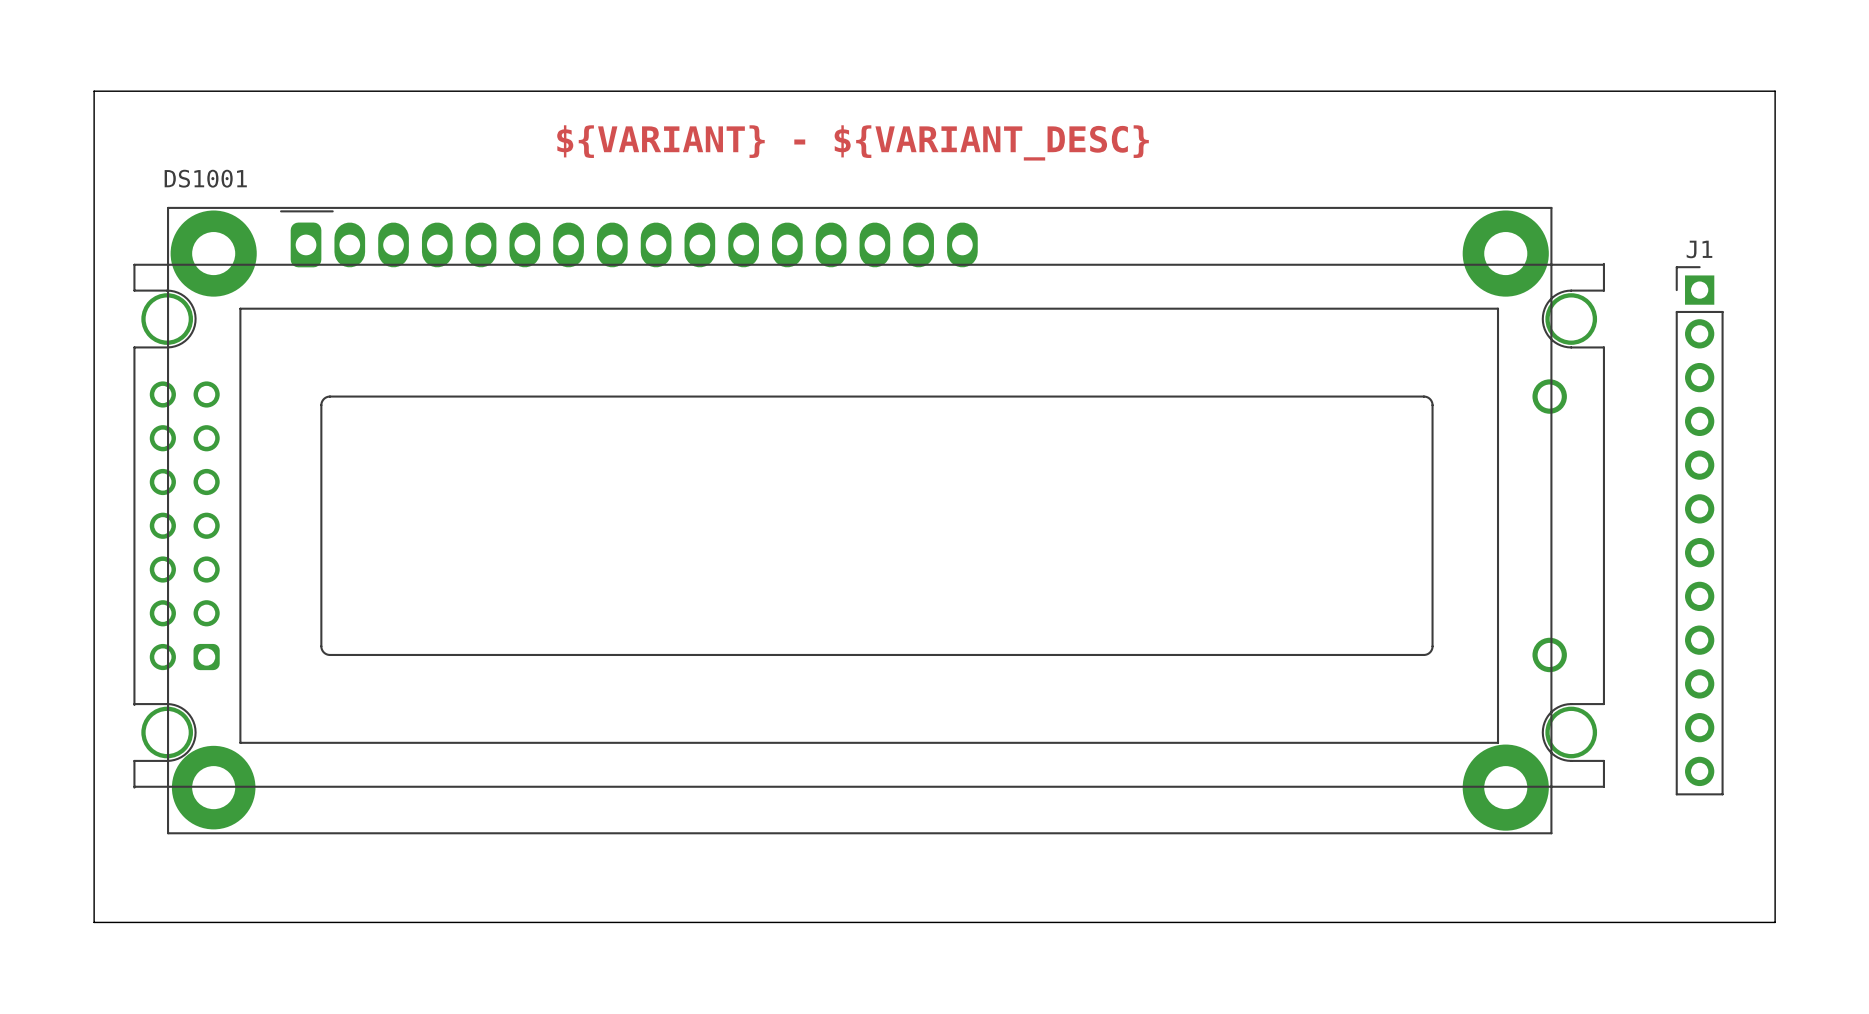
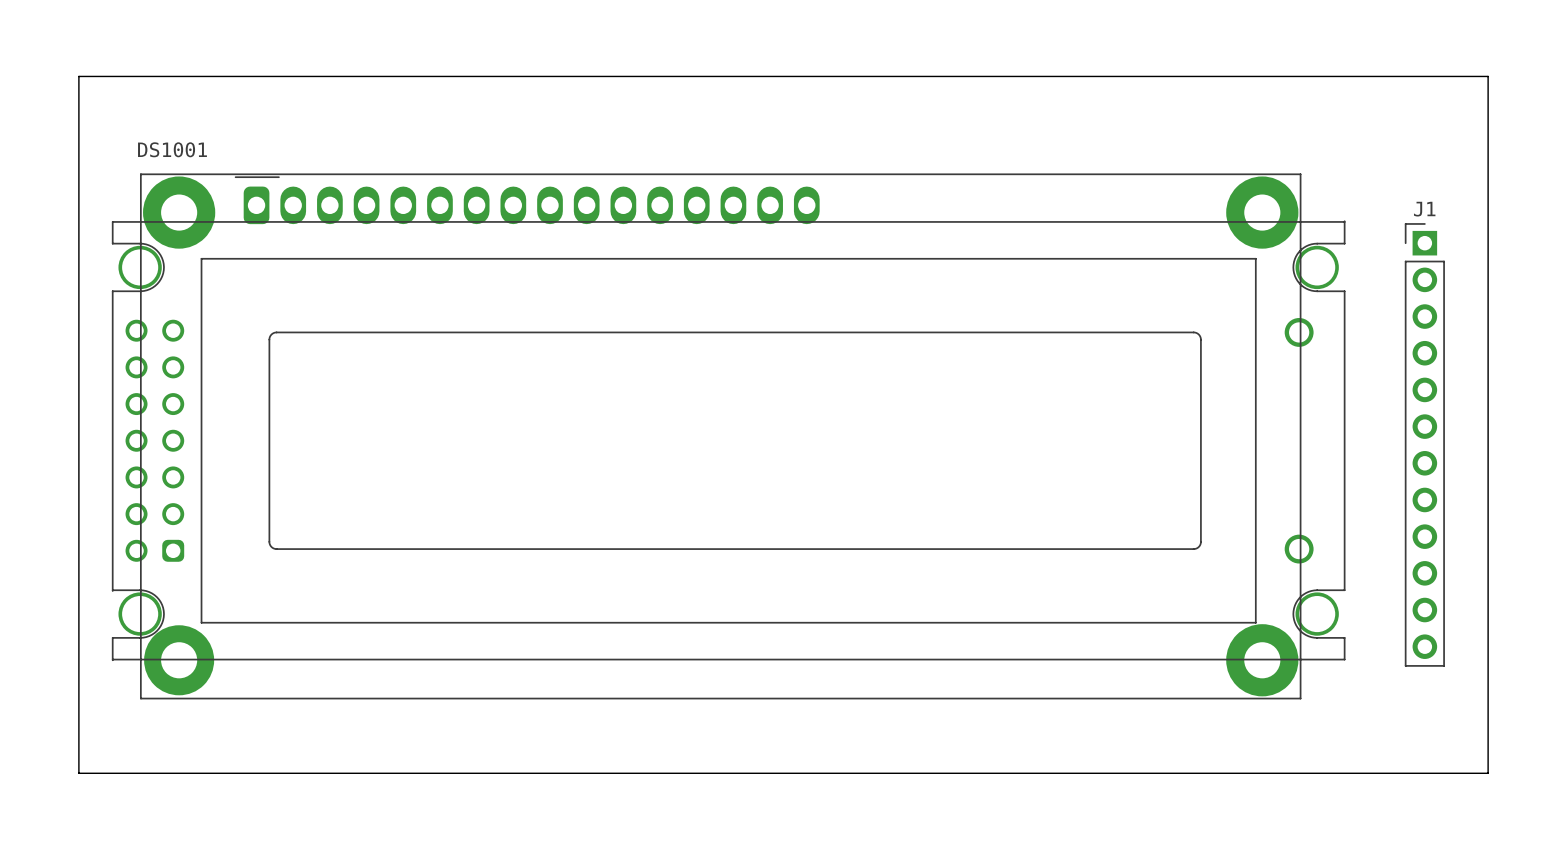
text: ${VARIANT} - ${VARIANT_DESC} (853, 142) -> none

